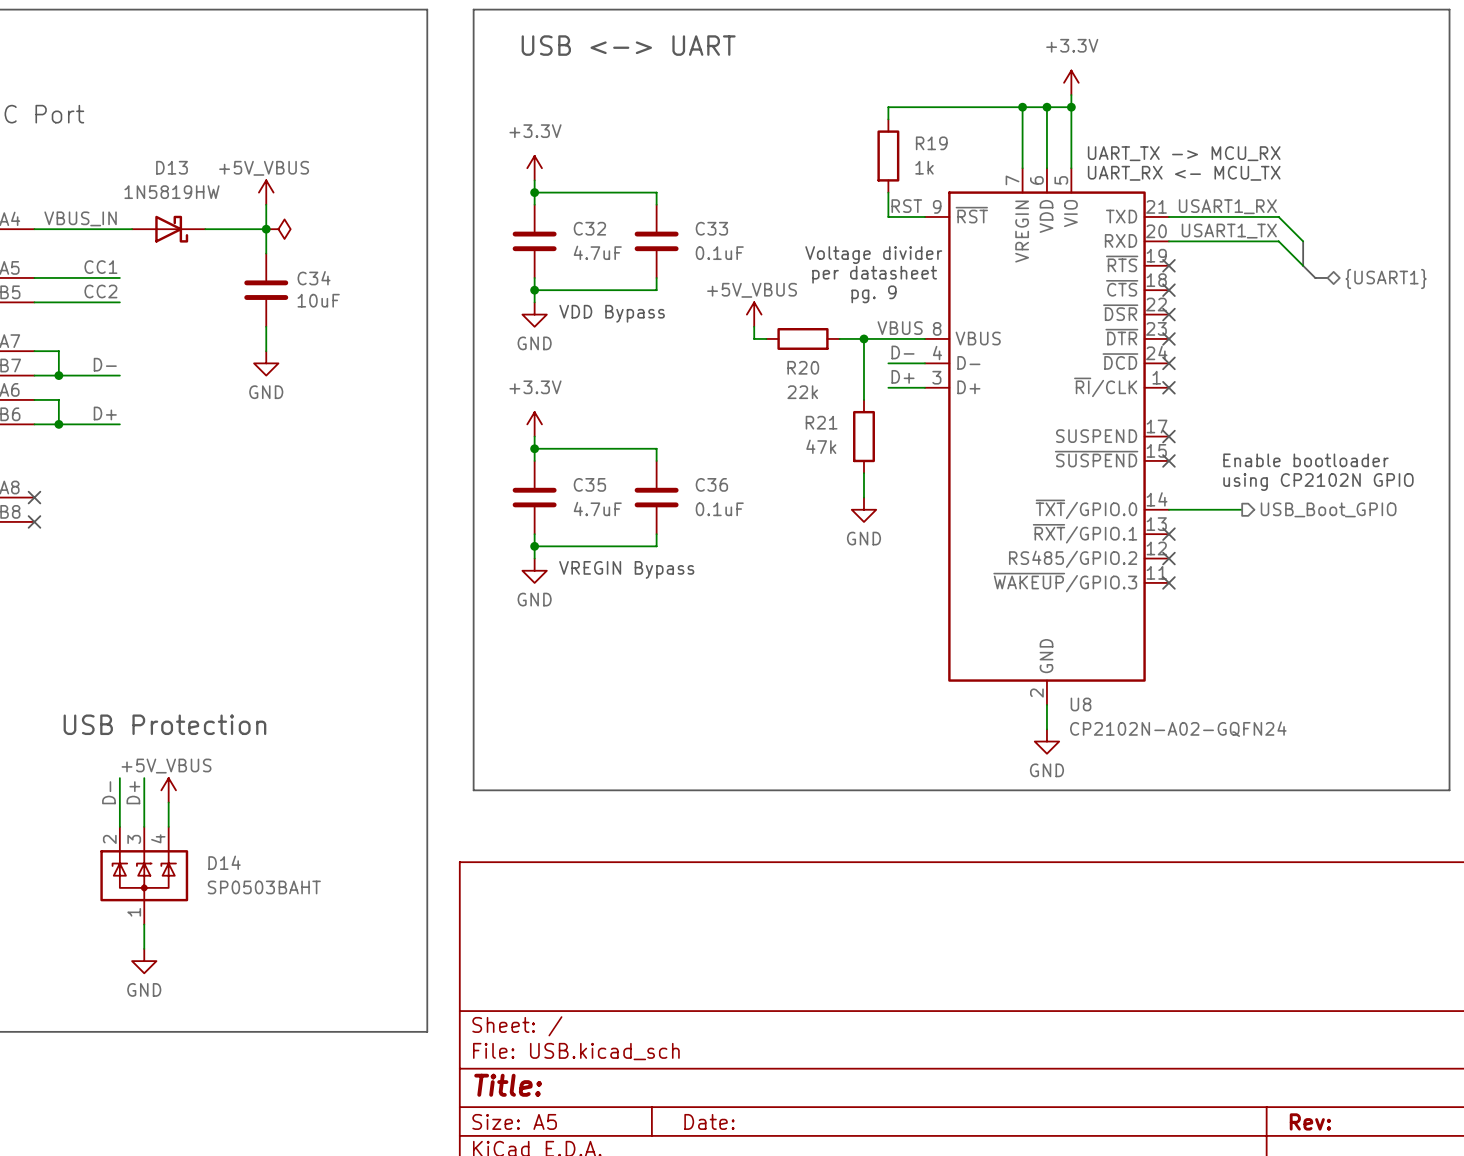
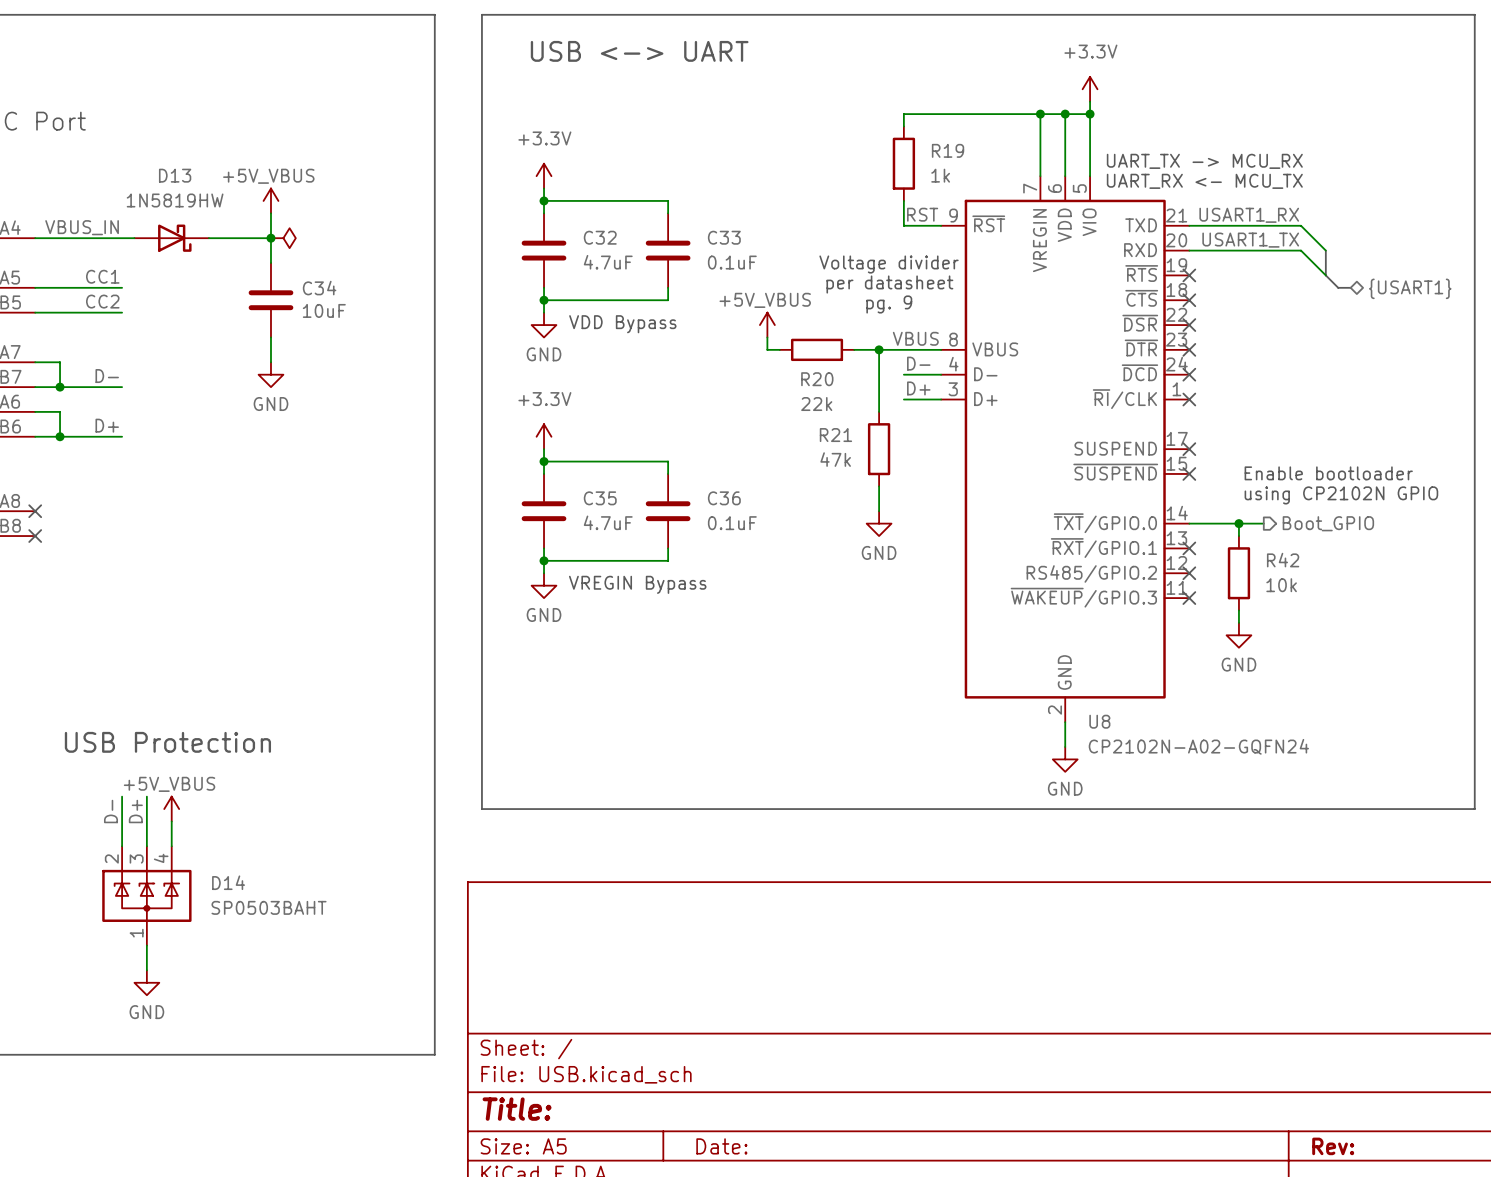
wire: none -> (1238, 523) (1238, 536)
junction: none -> (1238, 523)
hierarchical label: USB_Boot_GPIO (1328, 509) -> Boot_GPIO (1328, 523)
R42: none -> 10k (1238, 573)
wire: none -> (1238, 610) (1238, 622)
power symbol: none -> GND (1238, 635)

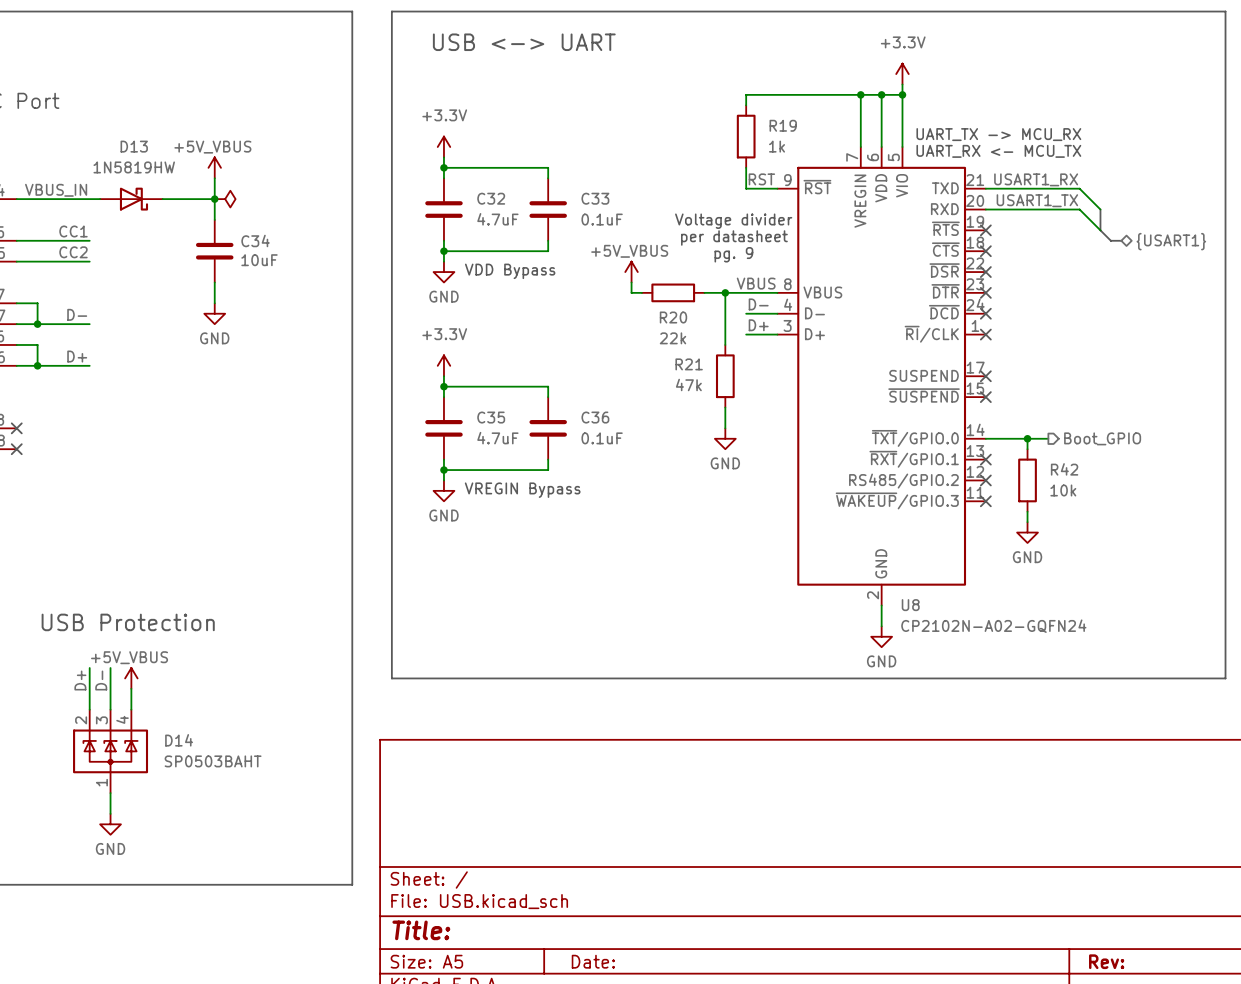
text: Enable bootloader (1328, 473) -> none
text: using CP2102N GPIO (1341, 495) -> none
label: D- (110, 811) -> D+ (80, 680)
label: D+ (135, 811) -> D- (101, 680)

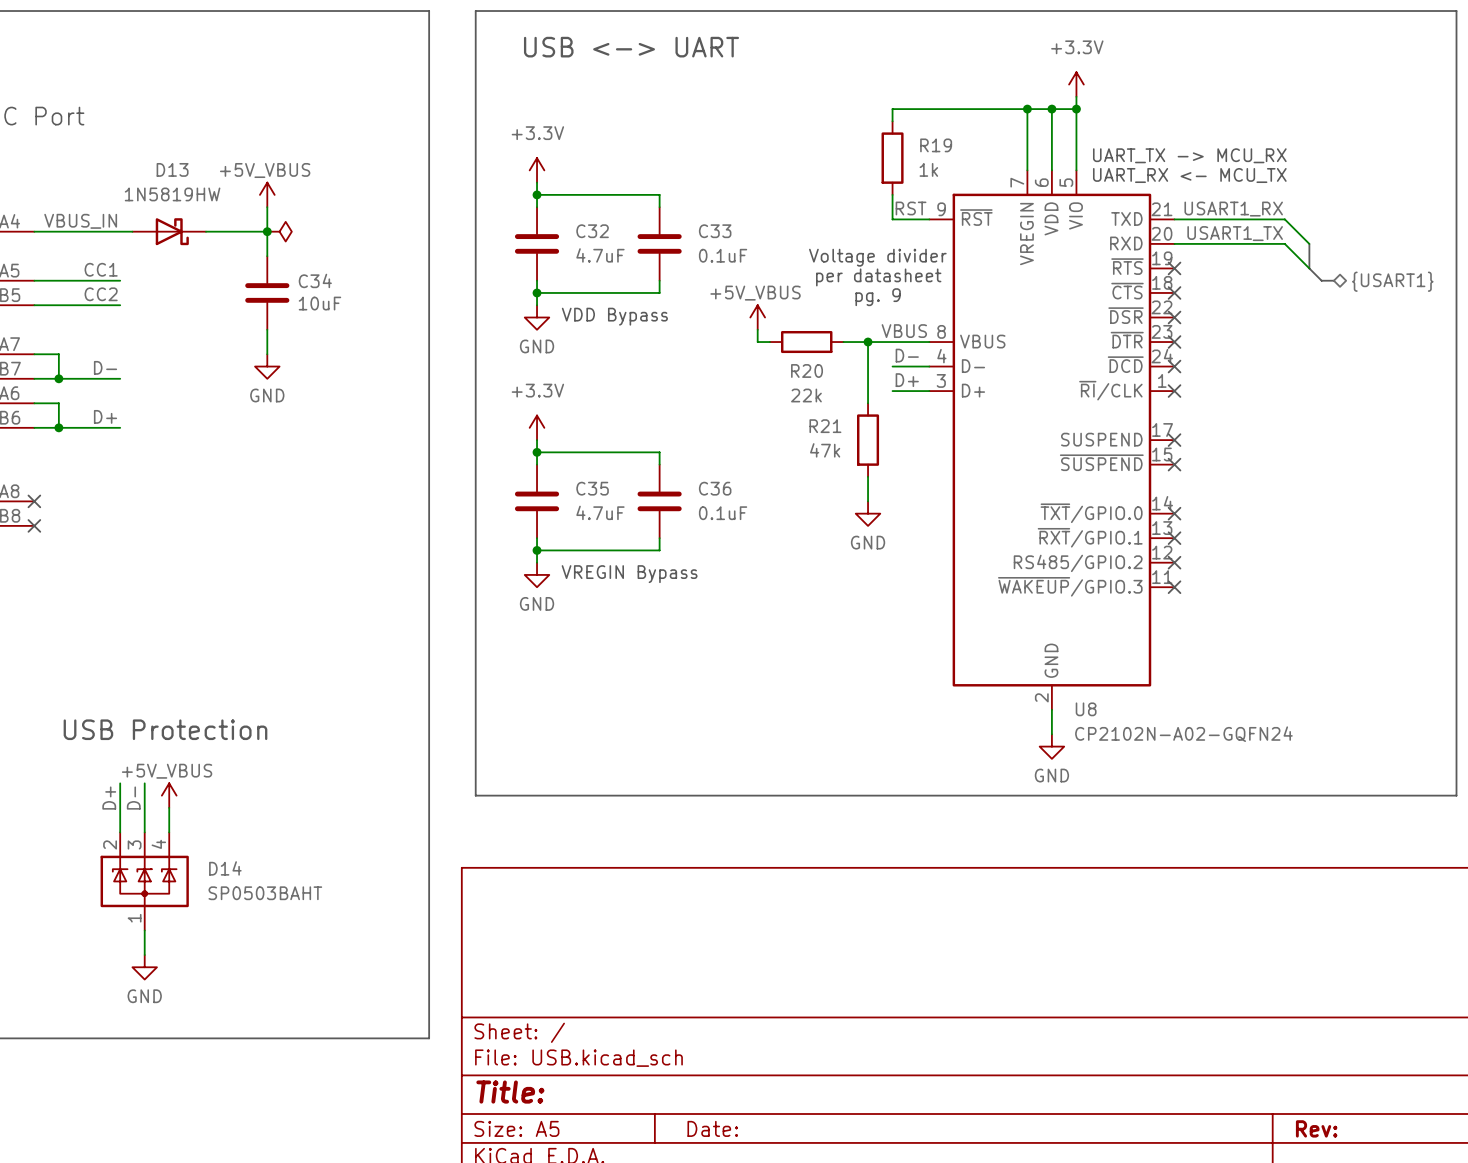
wire: (985, 438) (1048, 438) -> none
no-connect mark: none -> (1174, 513)
wire: (1027, 438) (1027, 449) -> none
junction: (1027, 438) -> none
hierarchical label: Boot_GPIO (1102, 438) -> none
R42: 10k (1027, 480) -> none
wire: (1027, 511) (1027, 522) -> none
power symbol: GND (1027, 532) -> none

